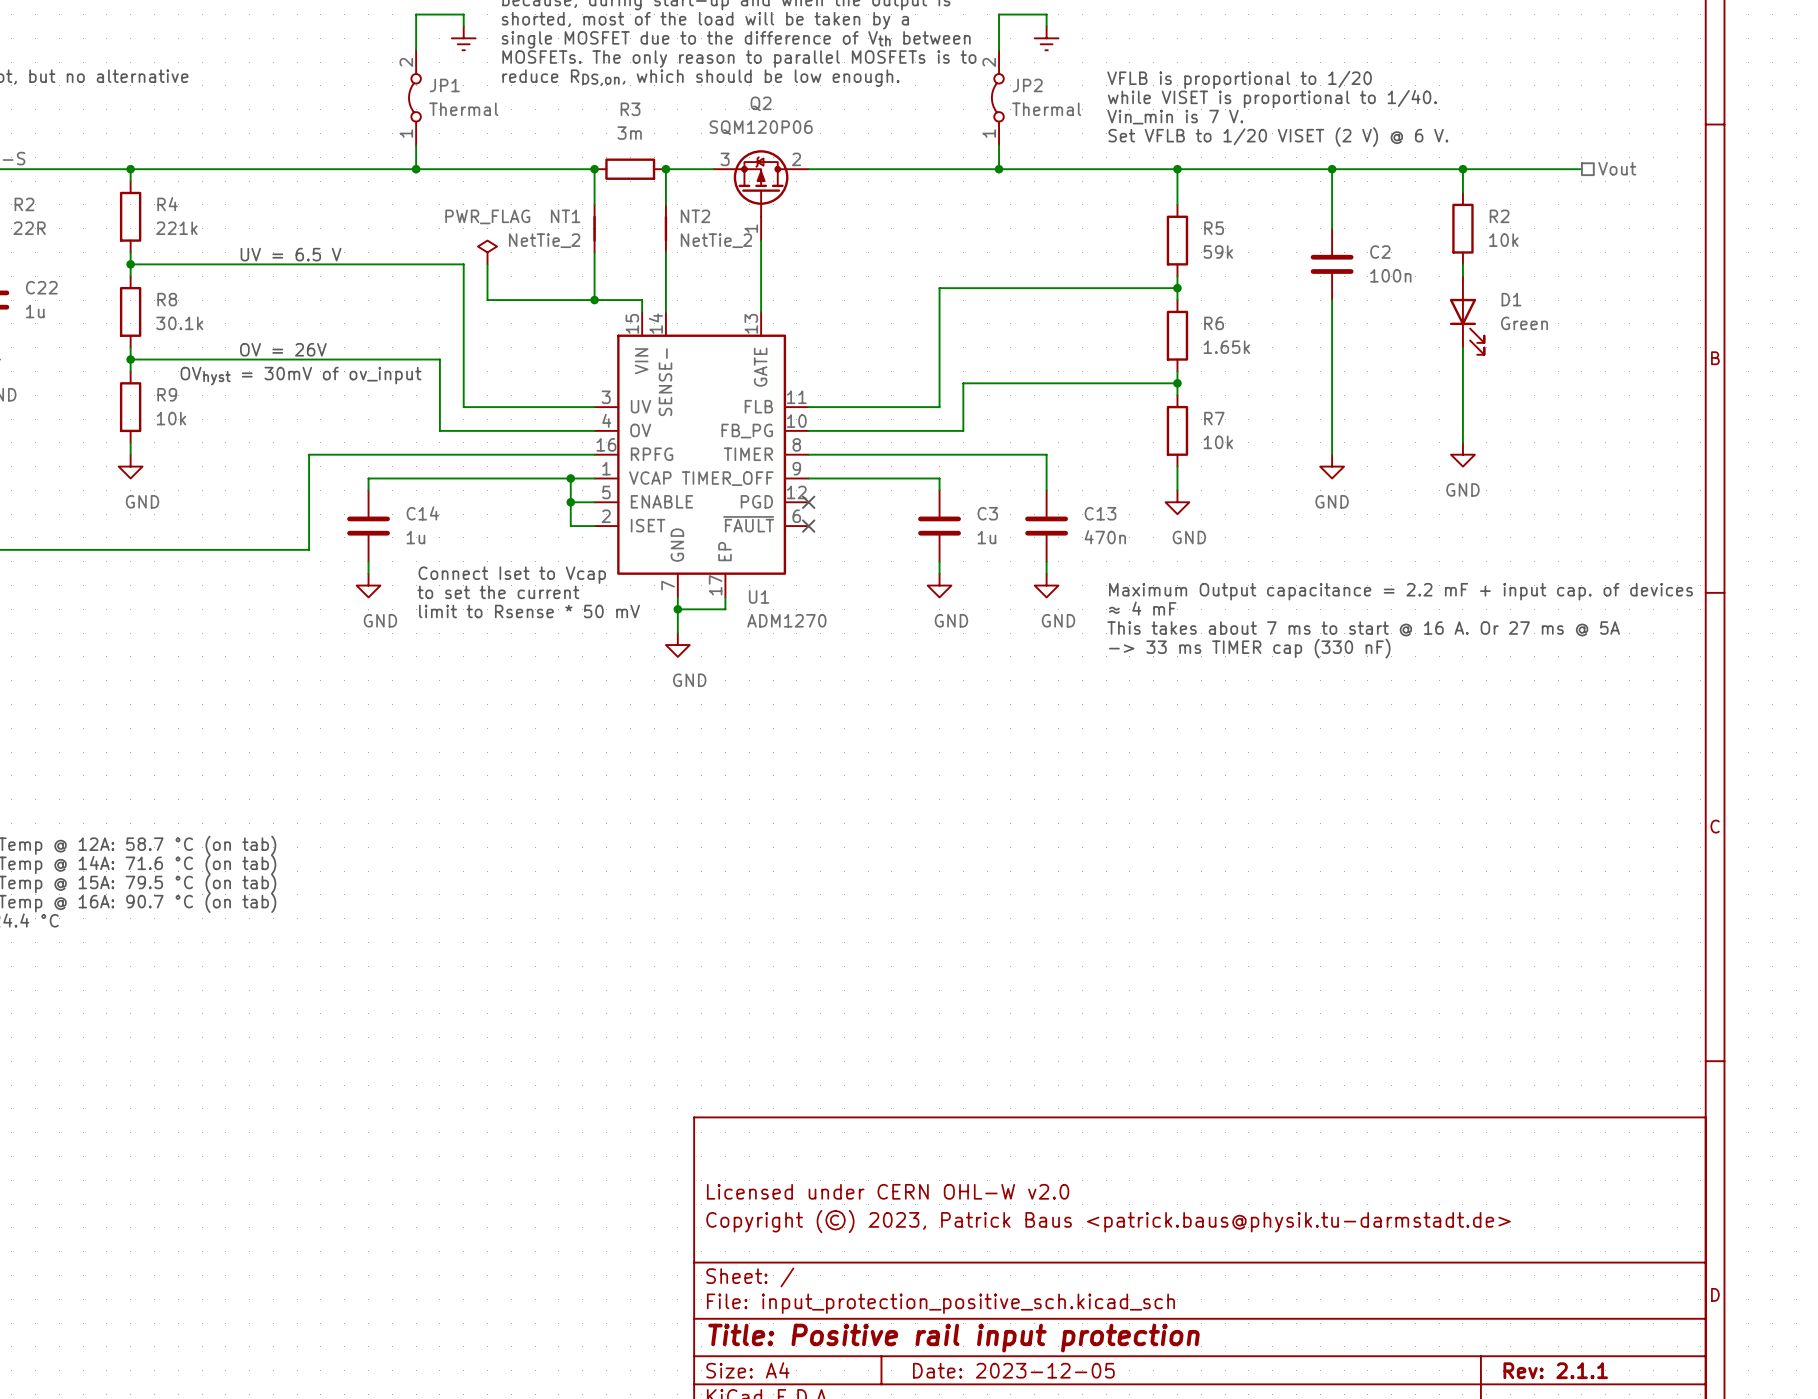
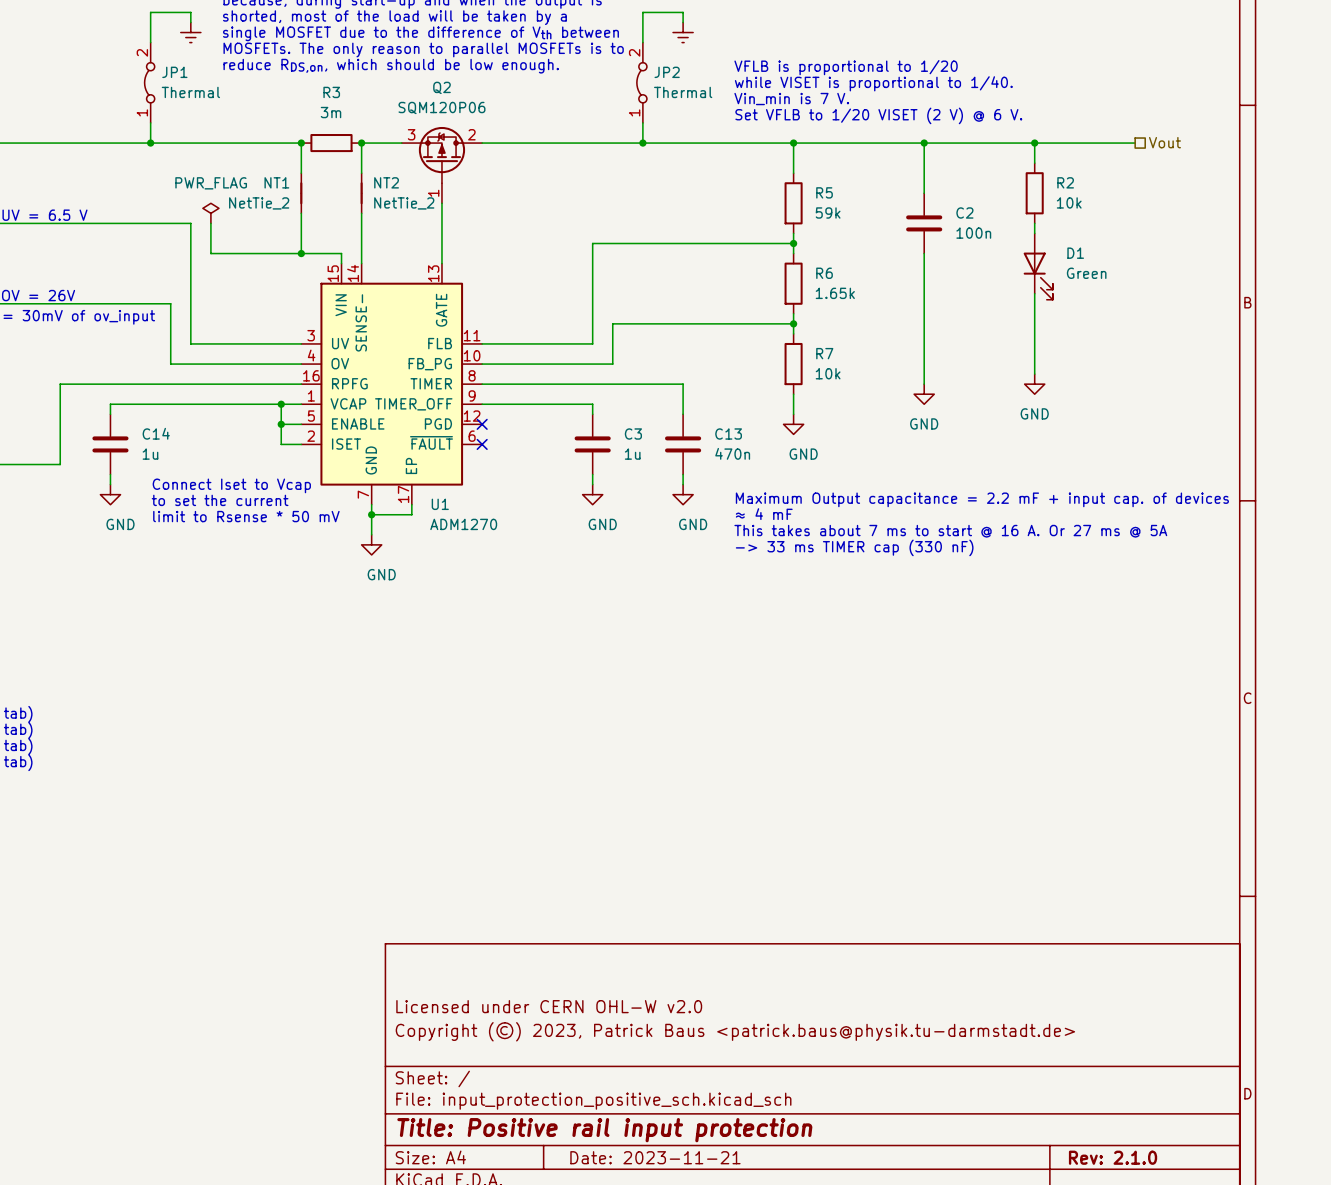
title block: Date: 2023-12-05 (1013, 1370) -> Date: 2023-11-21 (655, 1157)
title block: Rev: 2.1.1 (1555, 1370) -> Rev: 2.1.0 (1113, 1157)

